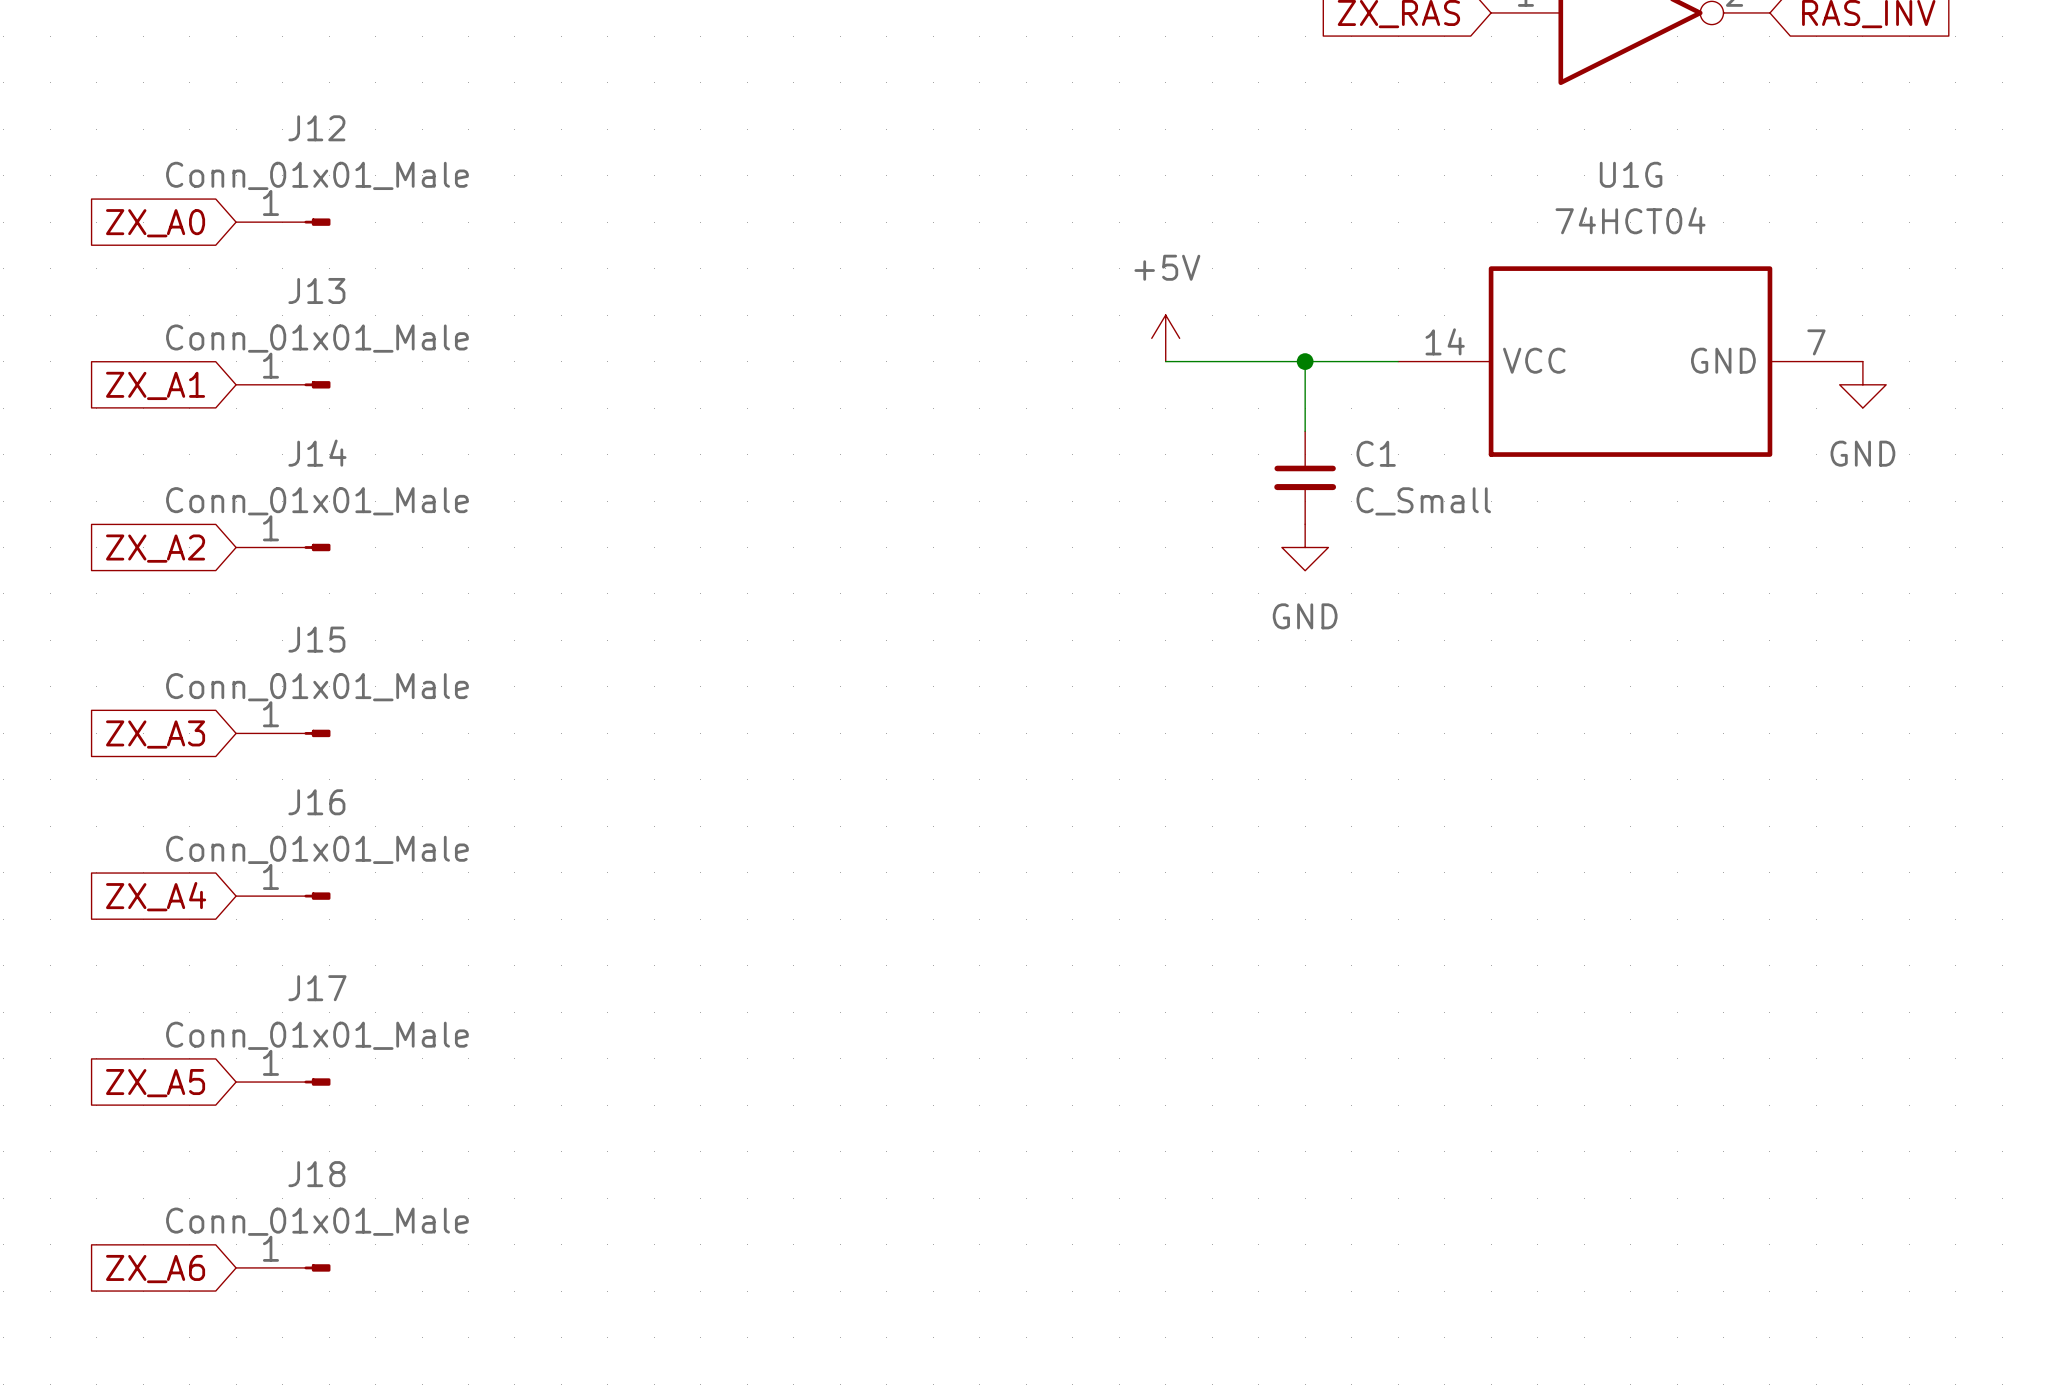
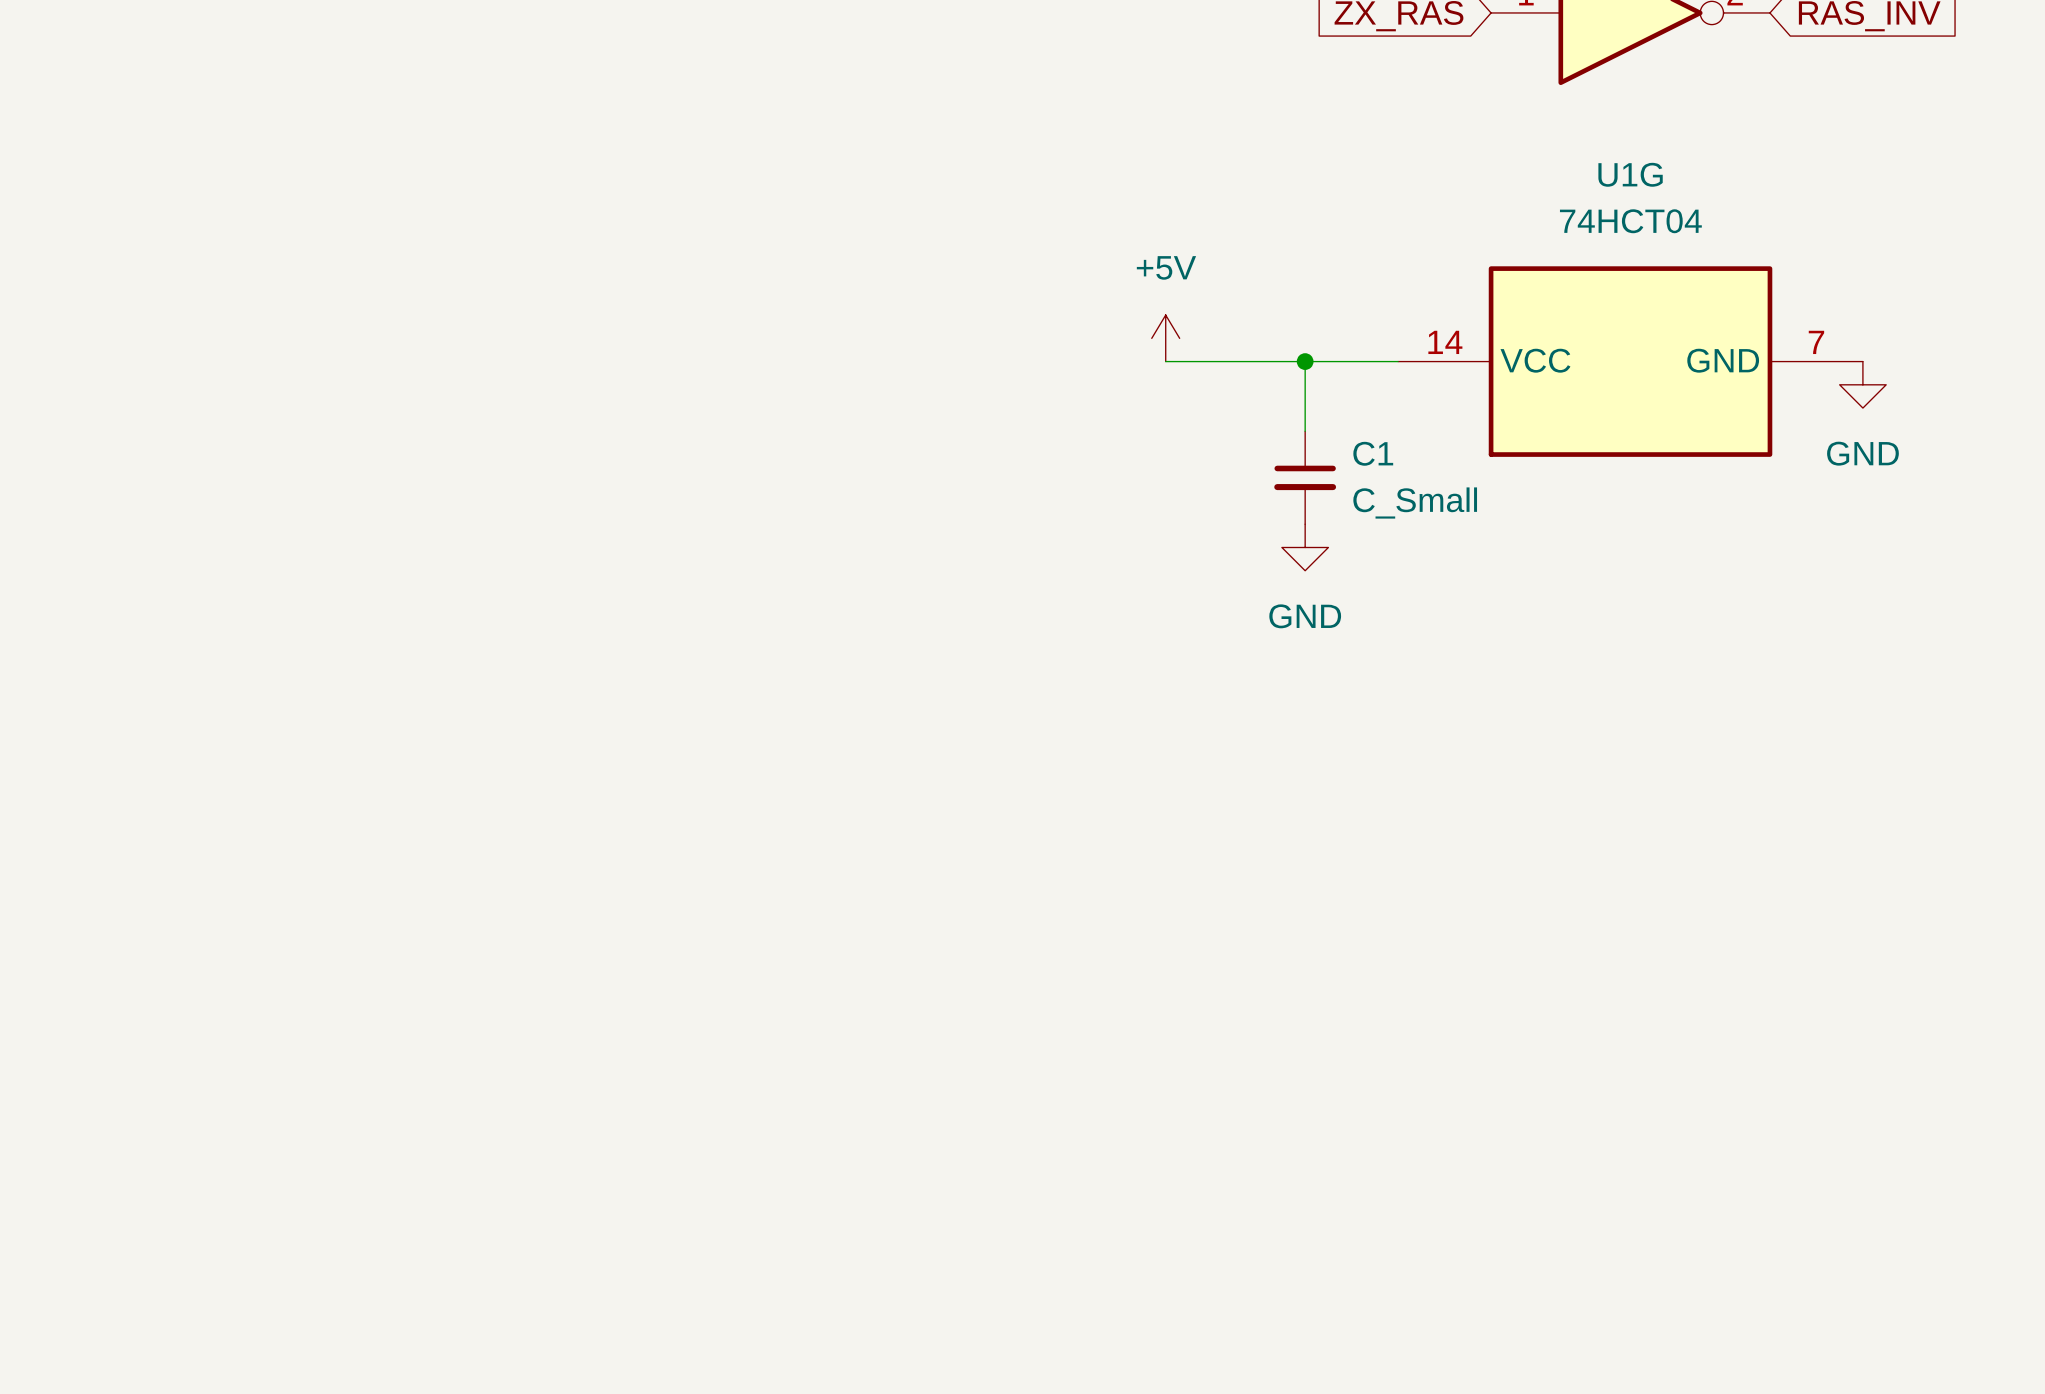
J12: Conn_01x01_Male (283, 222) -> none
global label: ZX_A0 (155, 223) -> none
J13: Conn_01x01_Male (283, 384) -> none
global label: ZX_A1 (155, 385) -> none
J14: Conn_01x01_Male (283, 547) -> none
global label: ZX_A2 (155, 548) -> none
J15: Conn_01x01_Male (283, 733) -> none
global label: ZX_A3 (155, 734) -> none
global label: ZX_A4 (156, 896) -> none
J16: Conn_01x01_Male (283, 896) -> none
J17: Conn_01x01_Male (283, 1082) -> none
global label: ZX_A5 (155, 1083) -> none
J18: Conn_01x01_Male (283, 1267) -> none
global label: ZX_A6 (155, 1269) -> none

